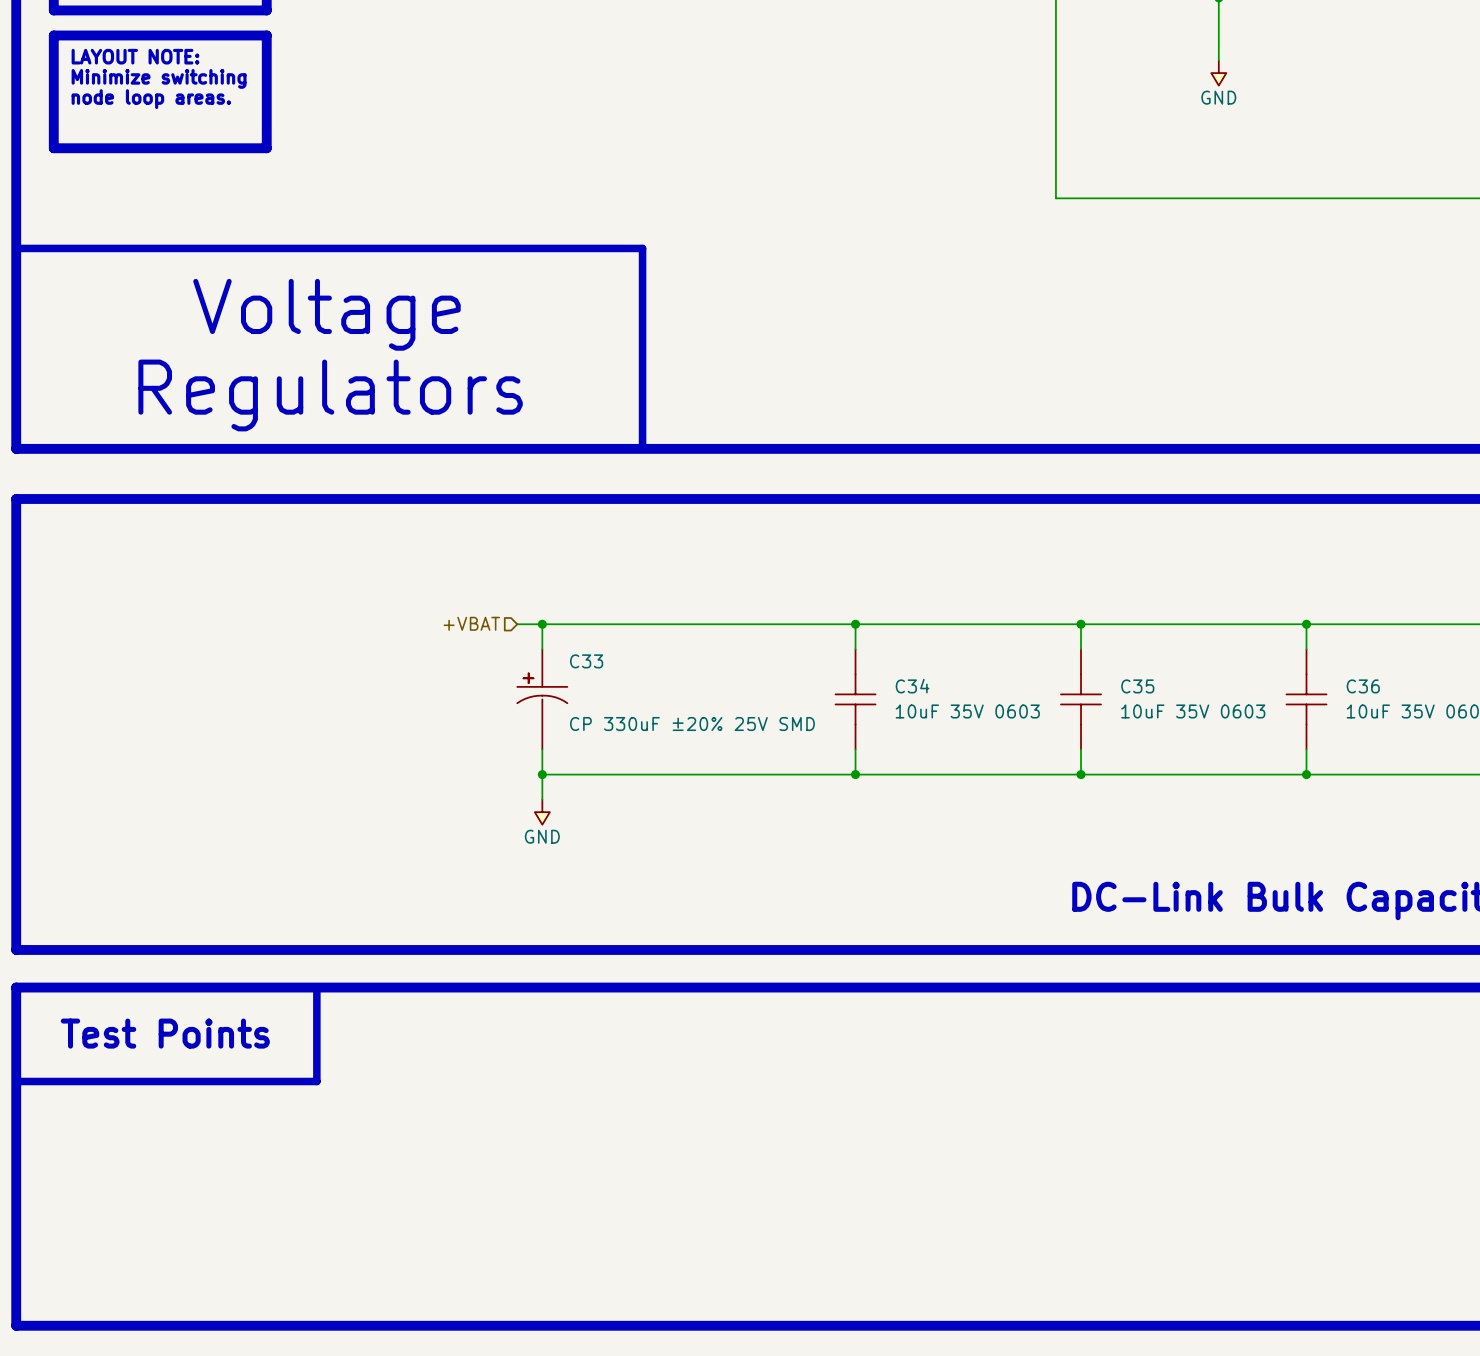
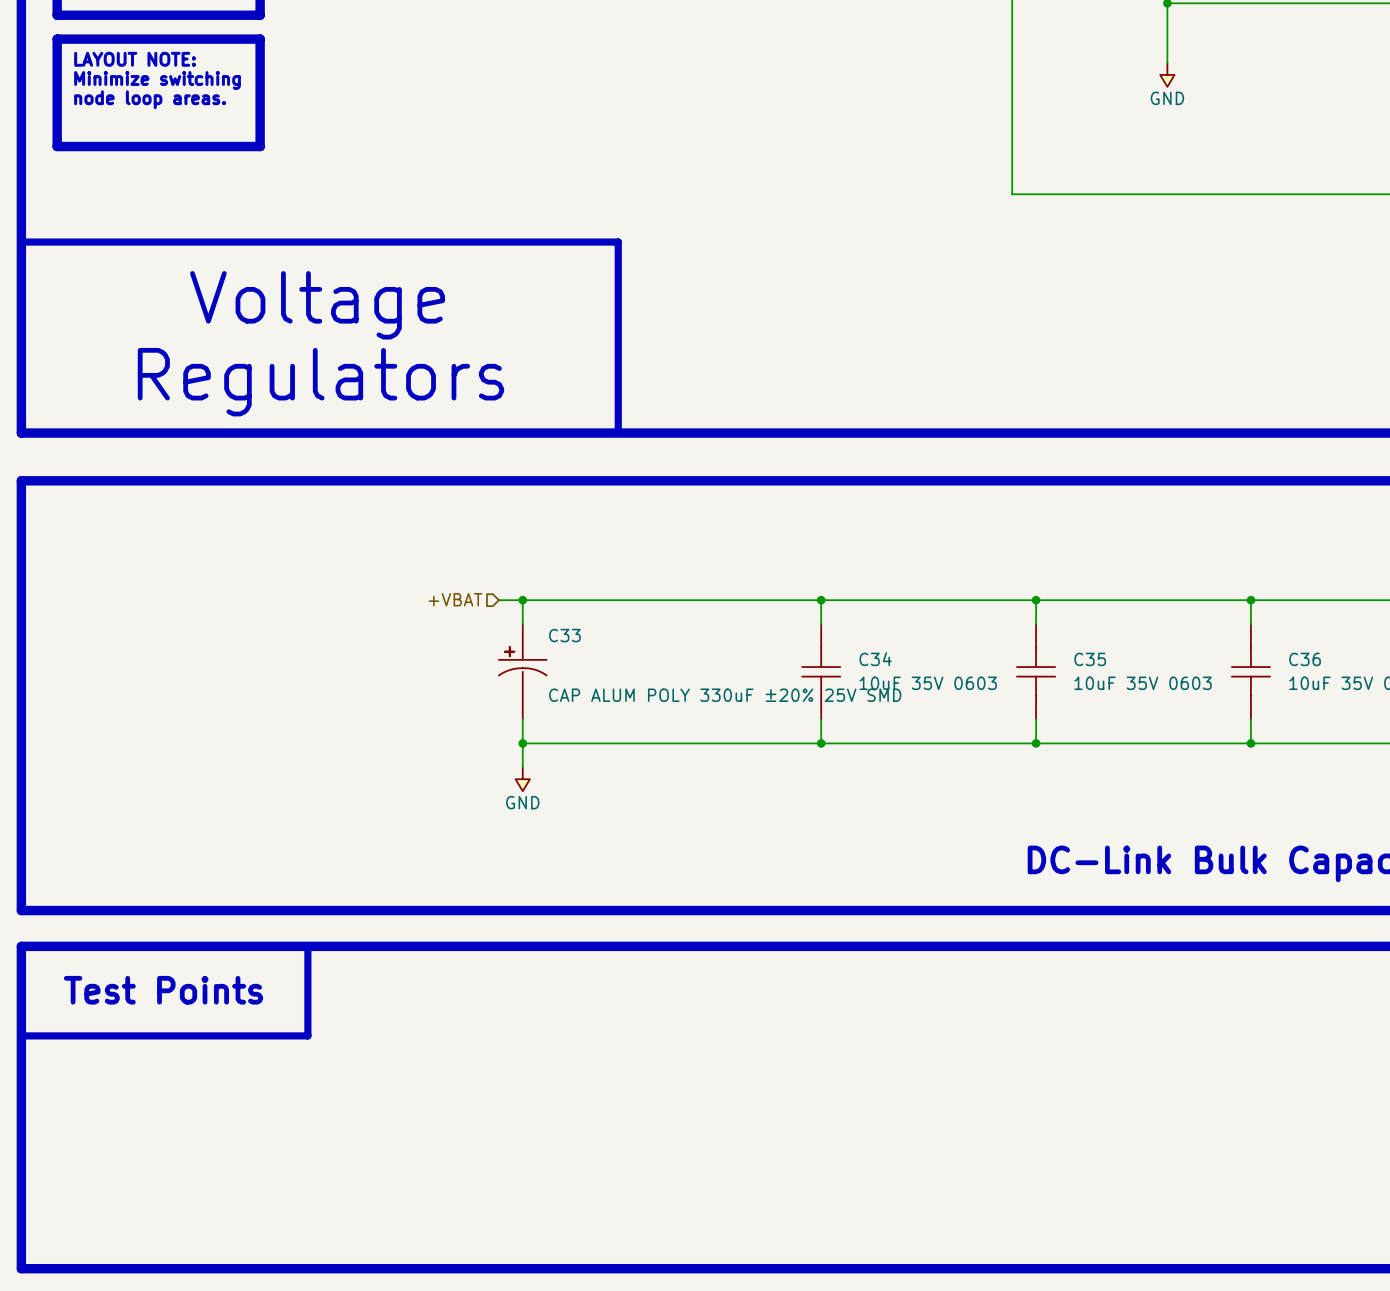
C33 text: CP 330uF ±20% 25V SMD (692, 724) -> CAP ALUM POLY 330uF ±20% 25V SMD (725, 695)

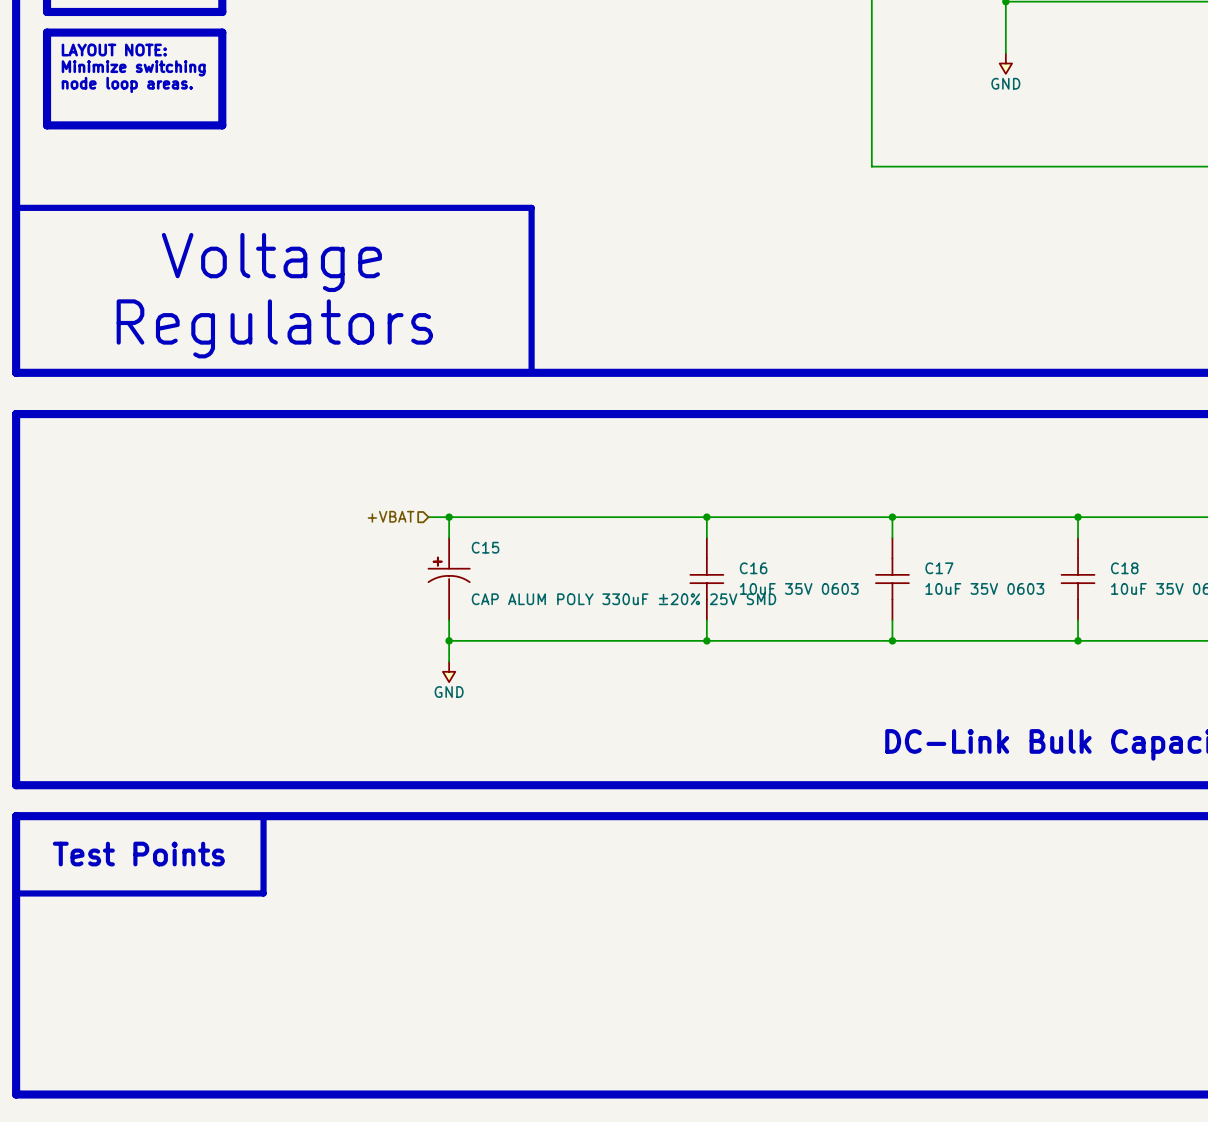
C33 name: C33 (564, 635) -> C15 (485, 547)
C34 name: C34 (875, 659) -> C16 (753, 568)
C35 name: C35 (1090, 659) -> C17 (939, 568)
C36 name: C36 (1305, 659) -> C18 (1124, 568)

